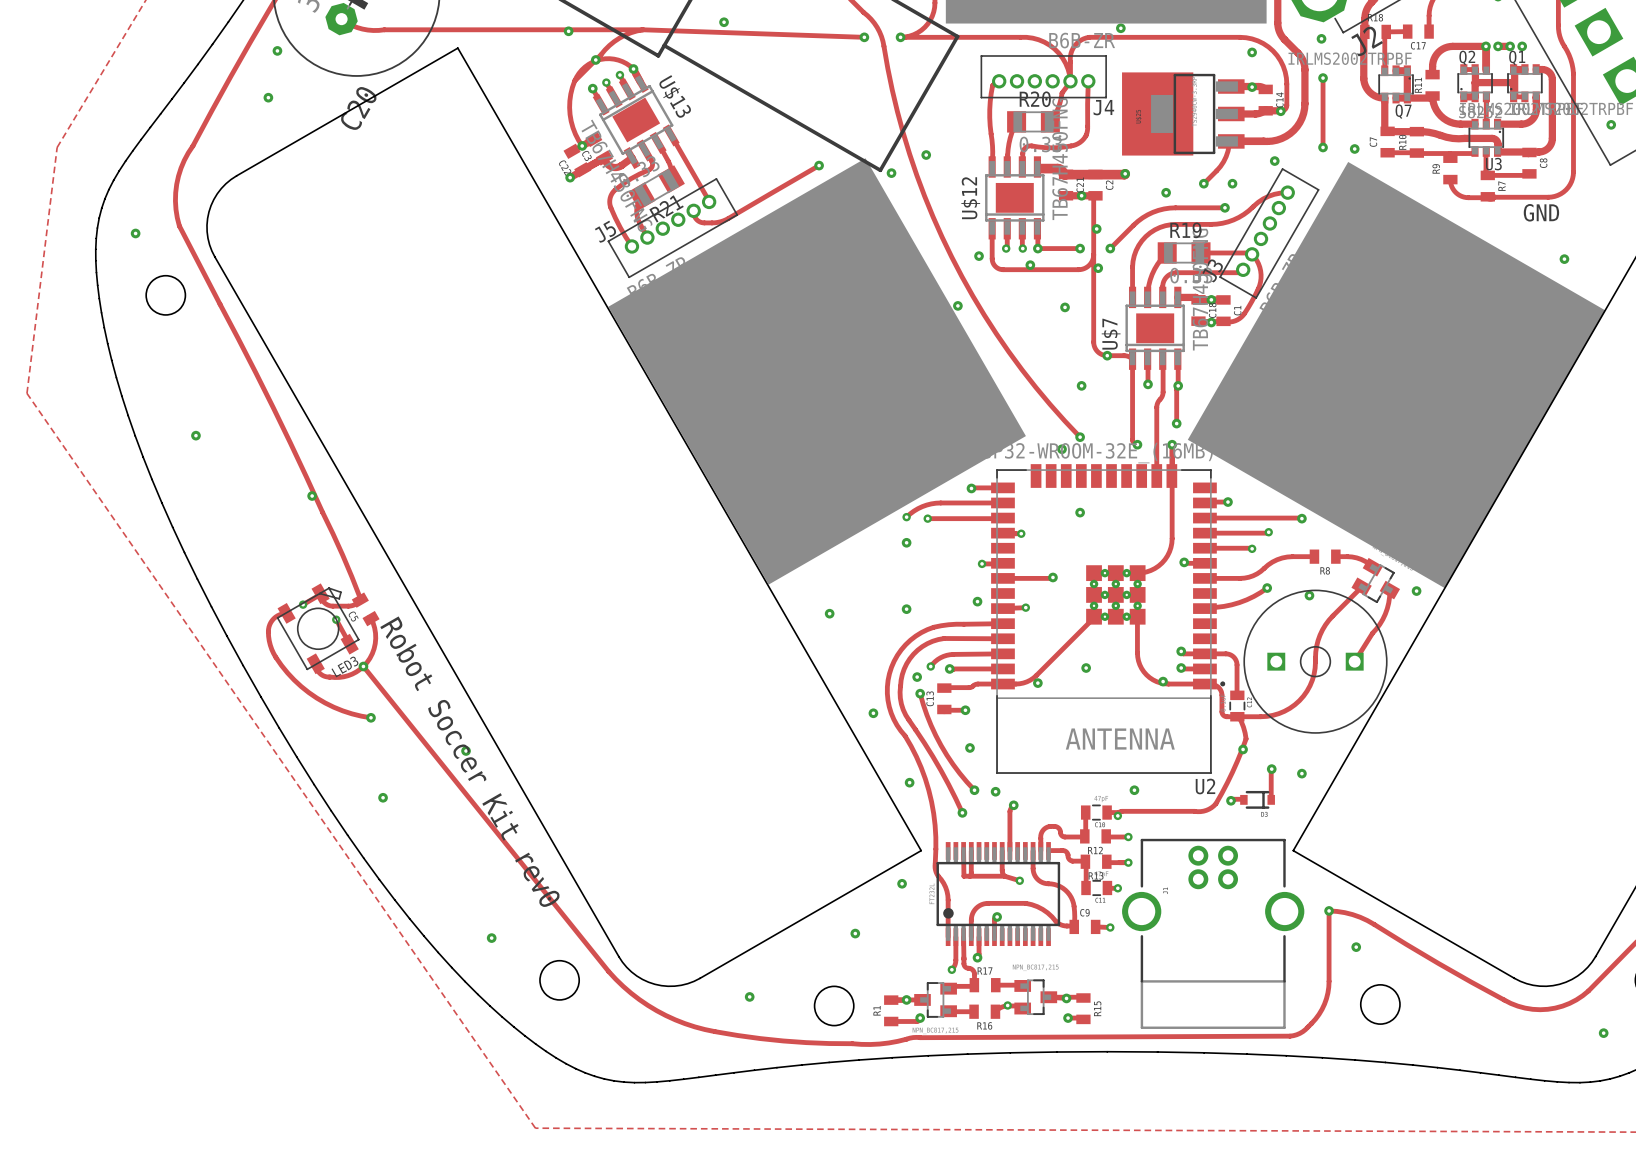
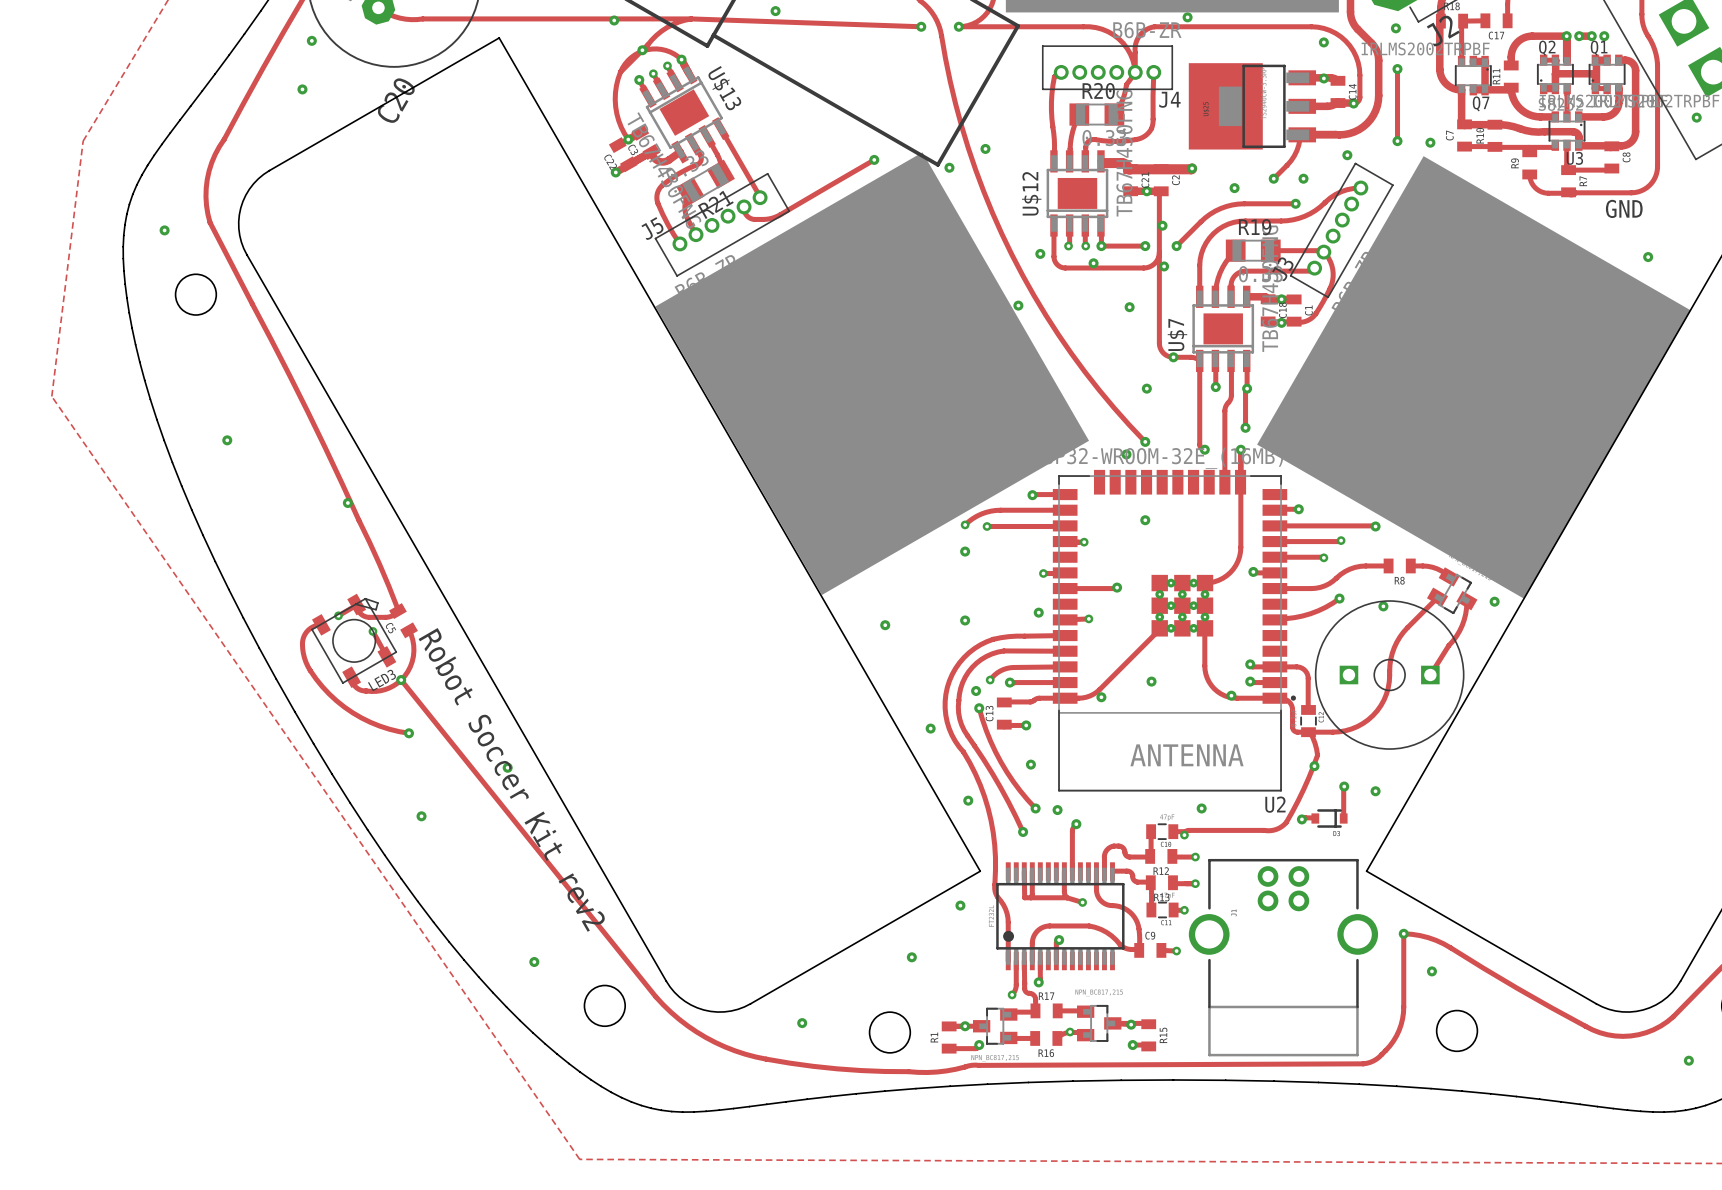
text: Robot Soccer Kit rev0 (470, 761) -> Robot Soccer Kit rev2 (511, 779)

